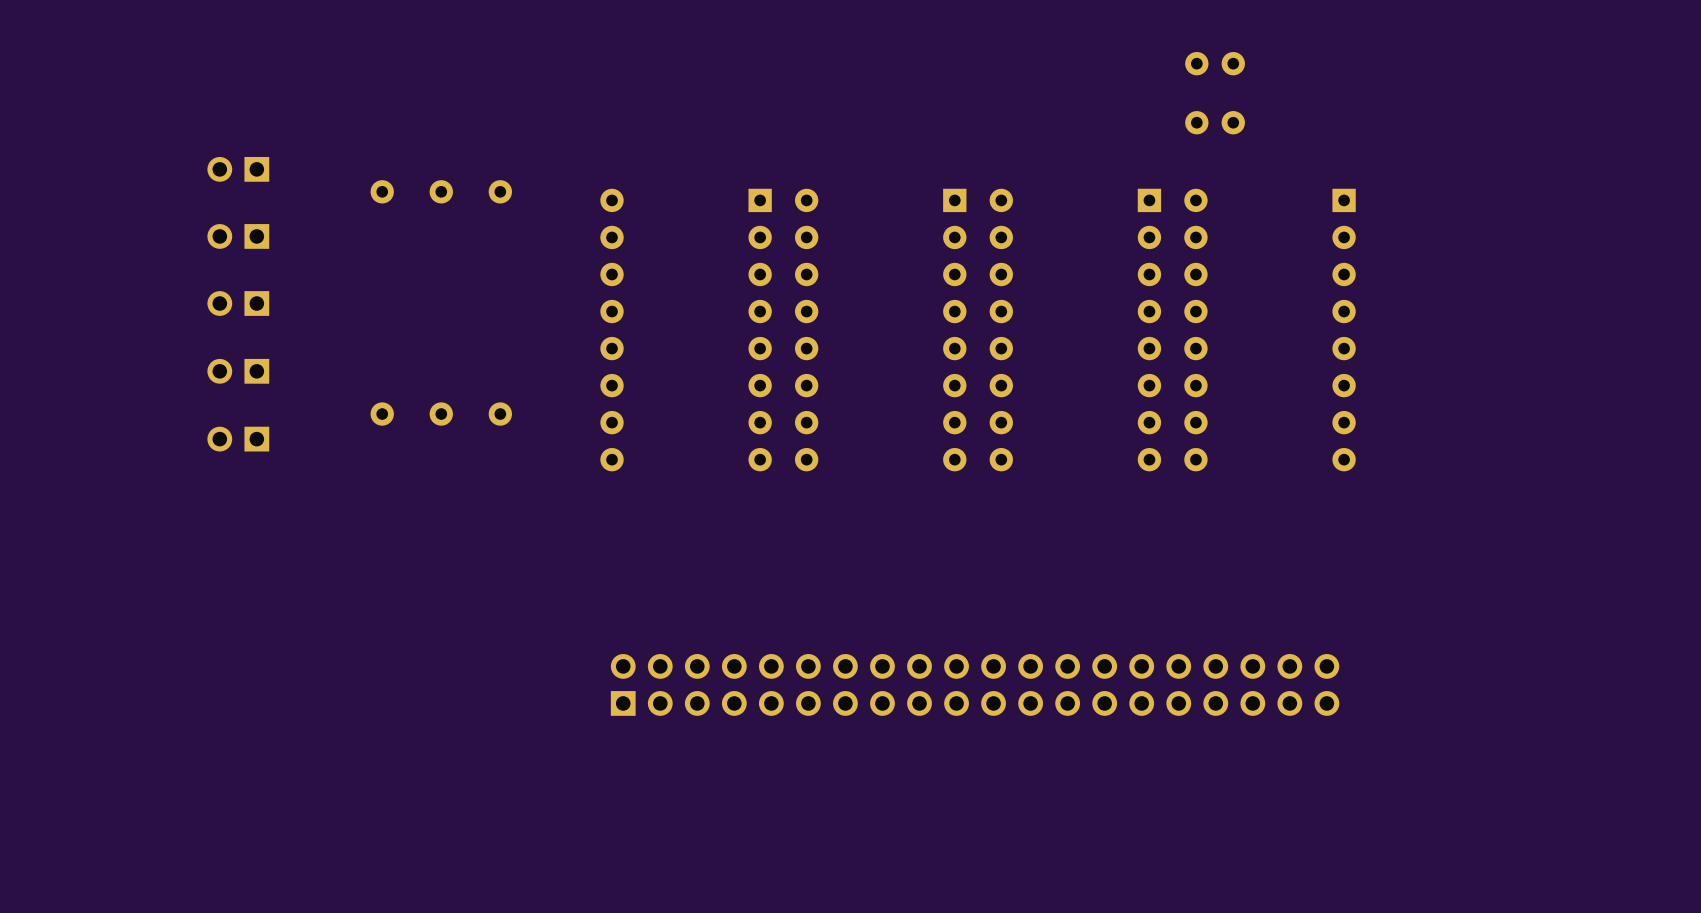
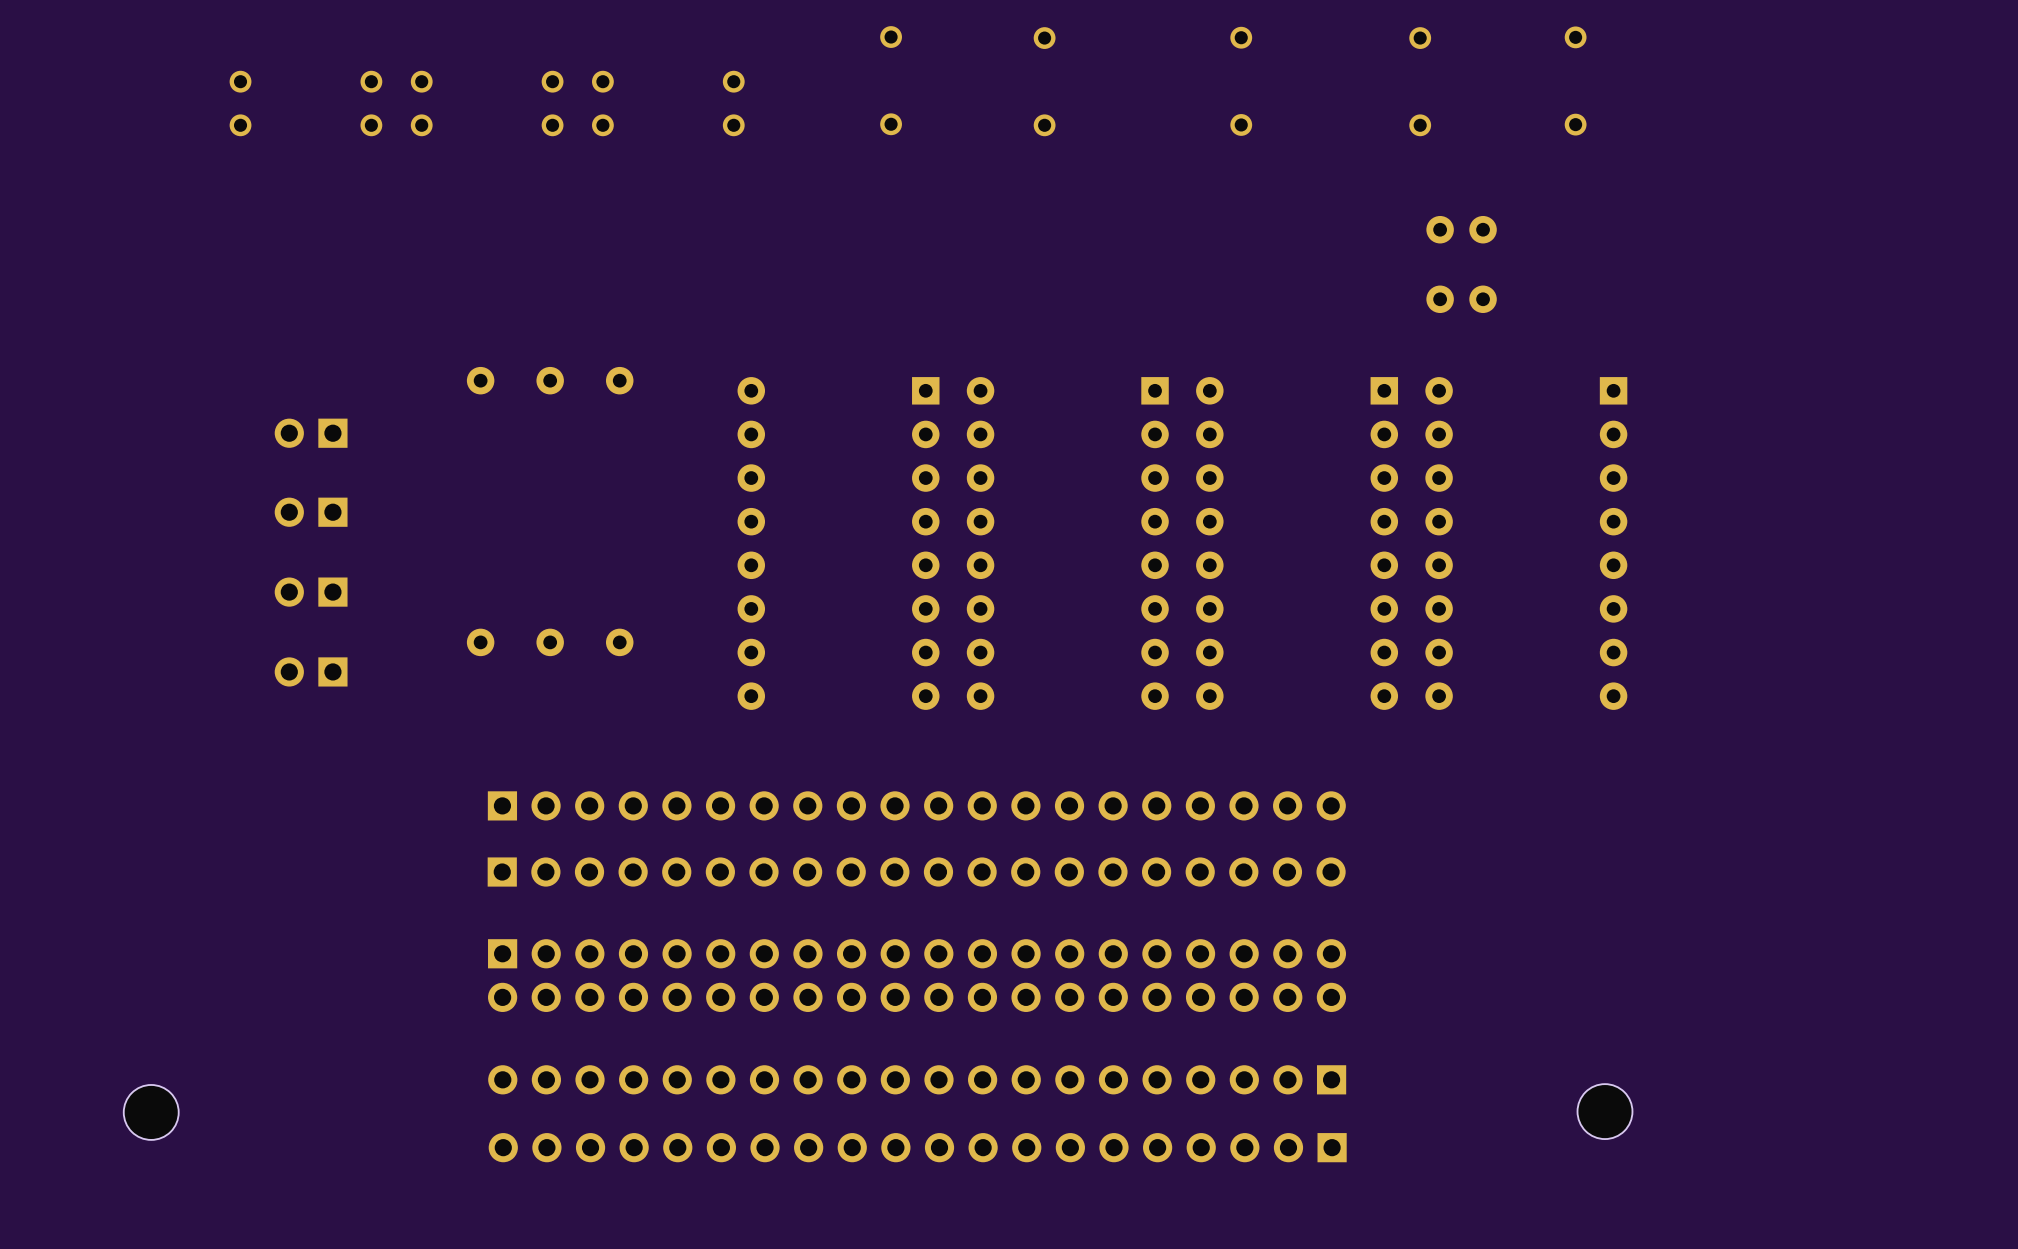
part: (238, 169) -> none
part: none -> (916, 805)
part: none -> (916, 872)
part: (975, 684) -> none
part: none -> (917, 975)
part: none -> (917, 1079)
part: none -> (1604, 1111)
part: none -> (151, 1112)
part: none -> (917, 1147)

